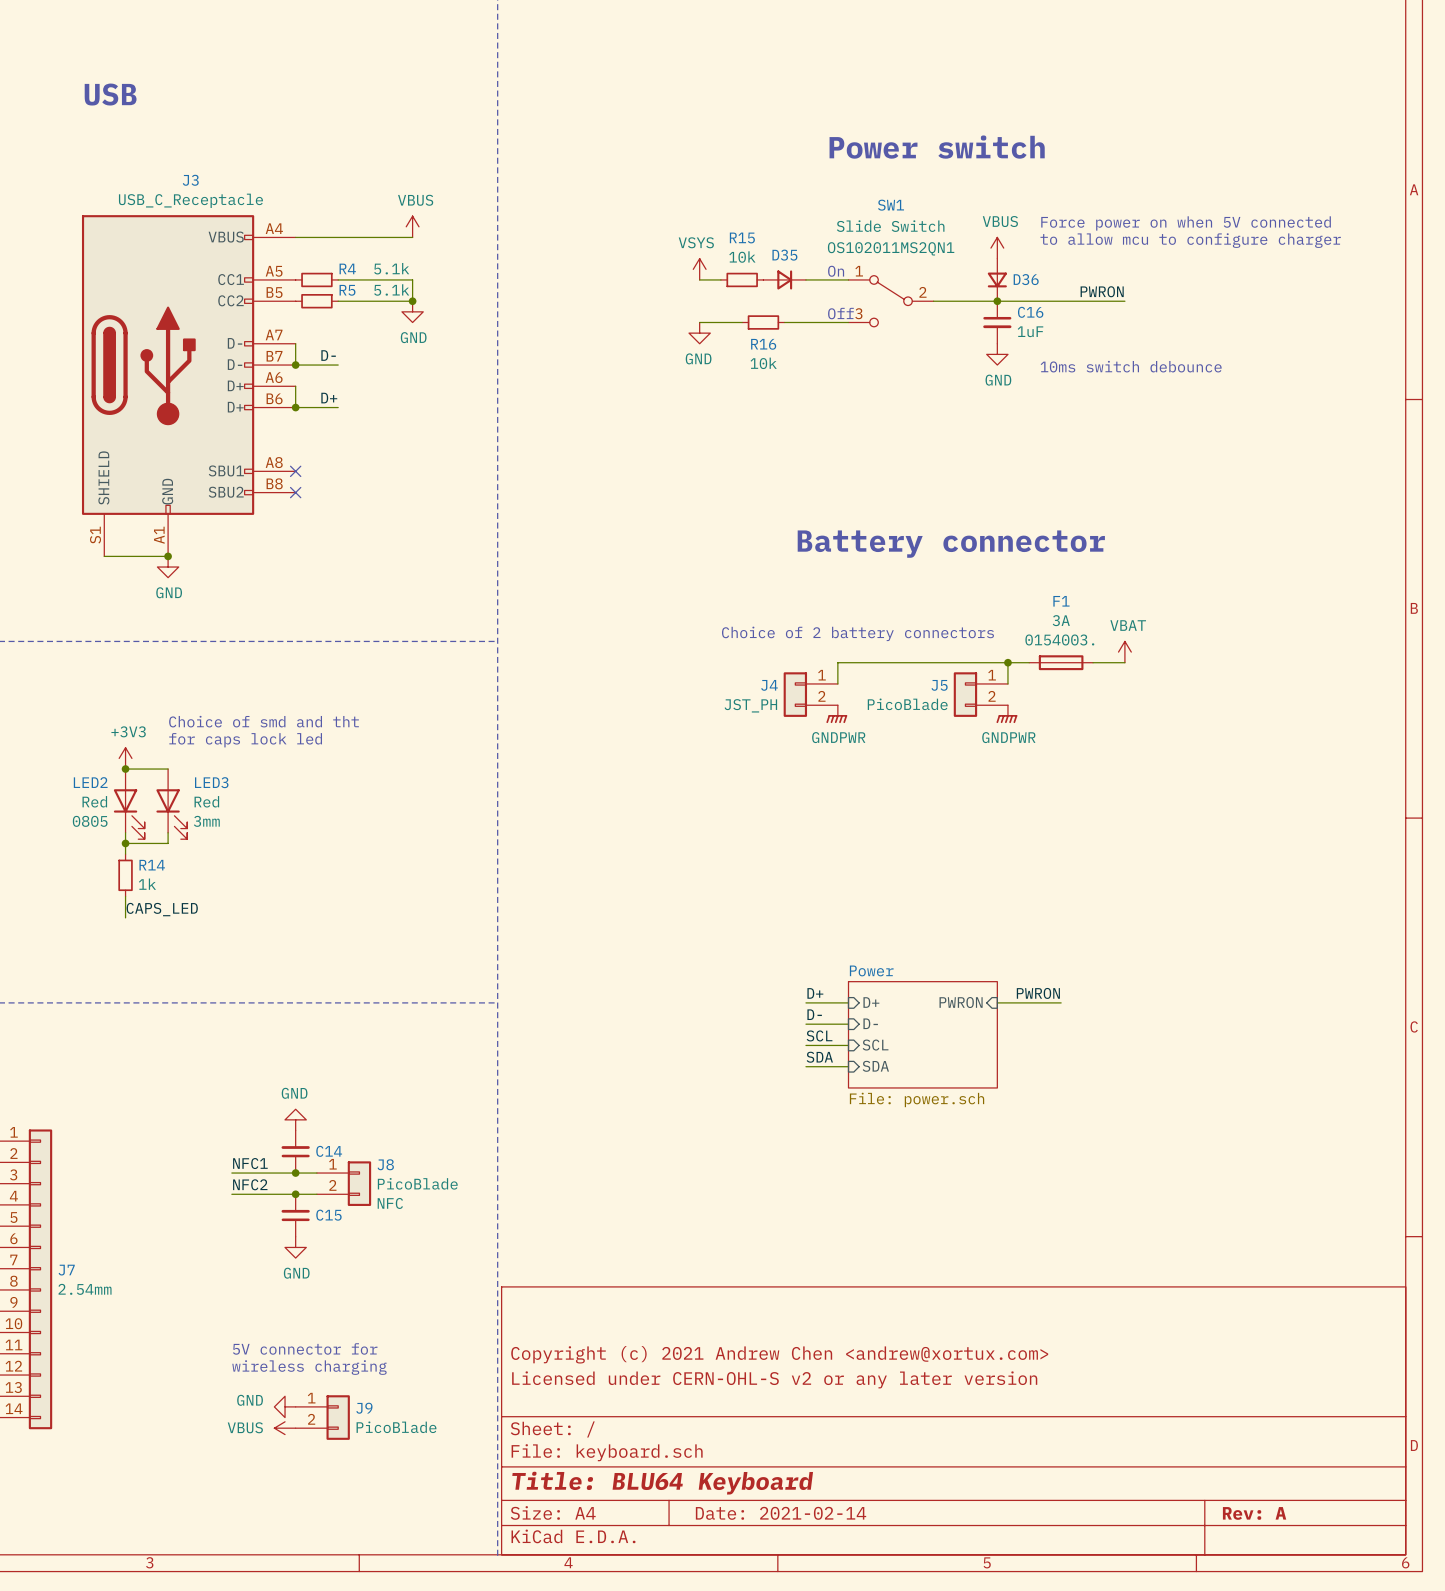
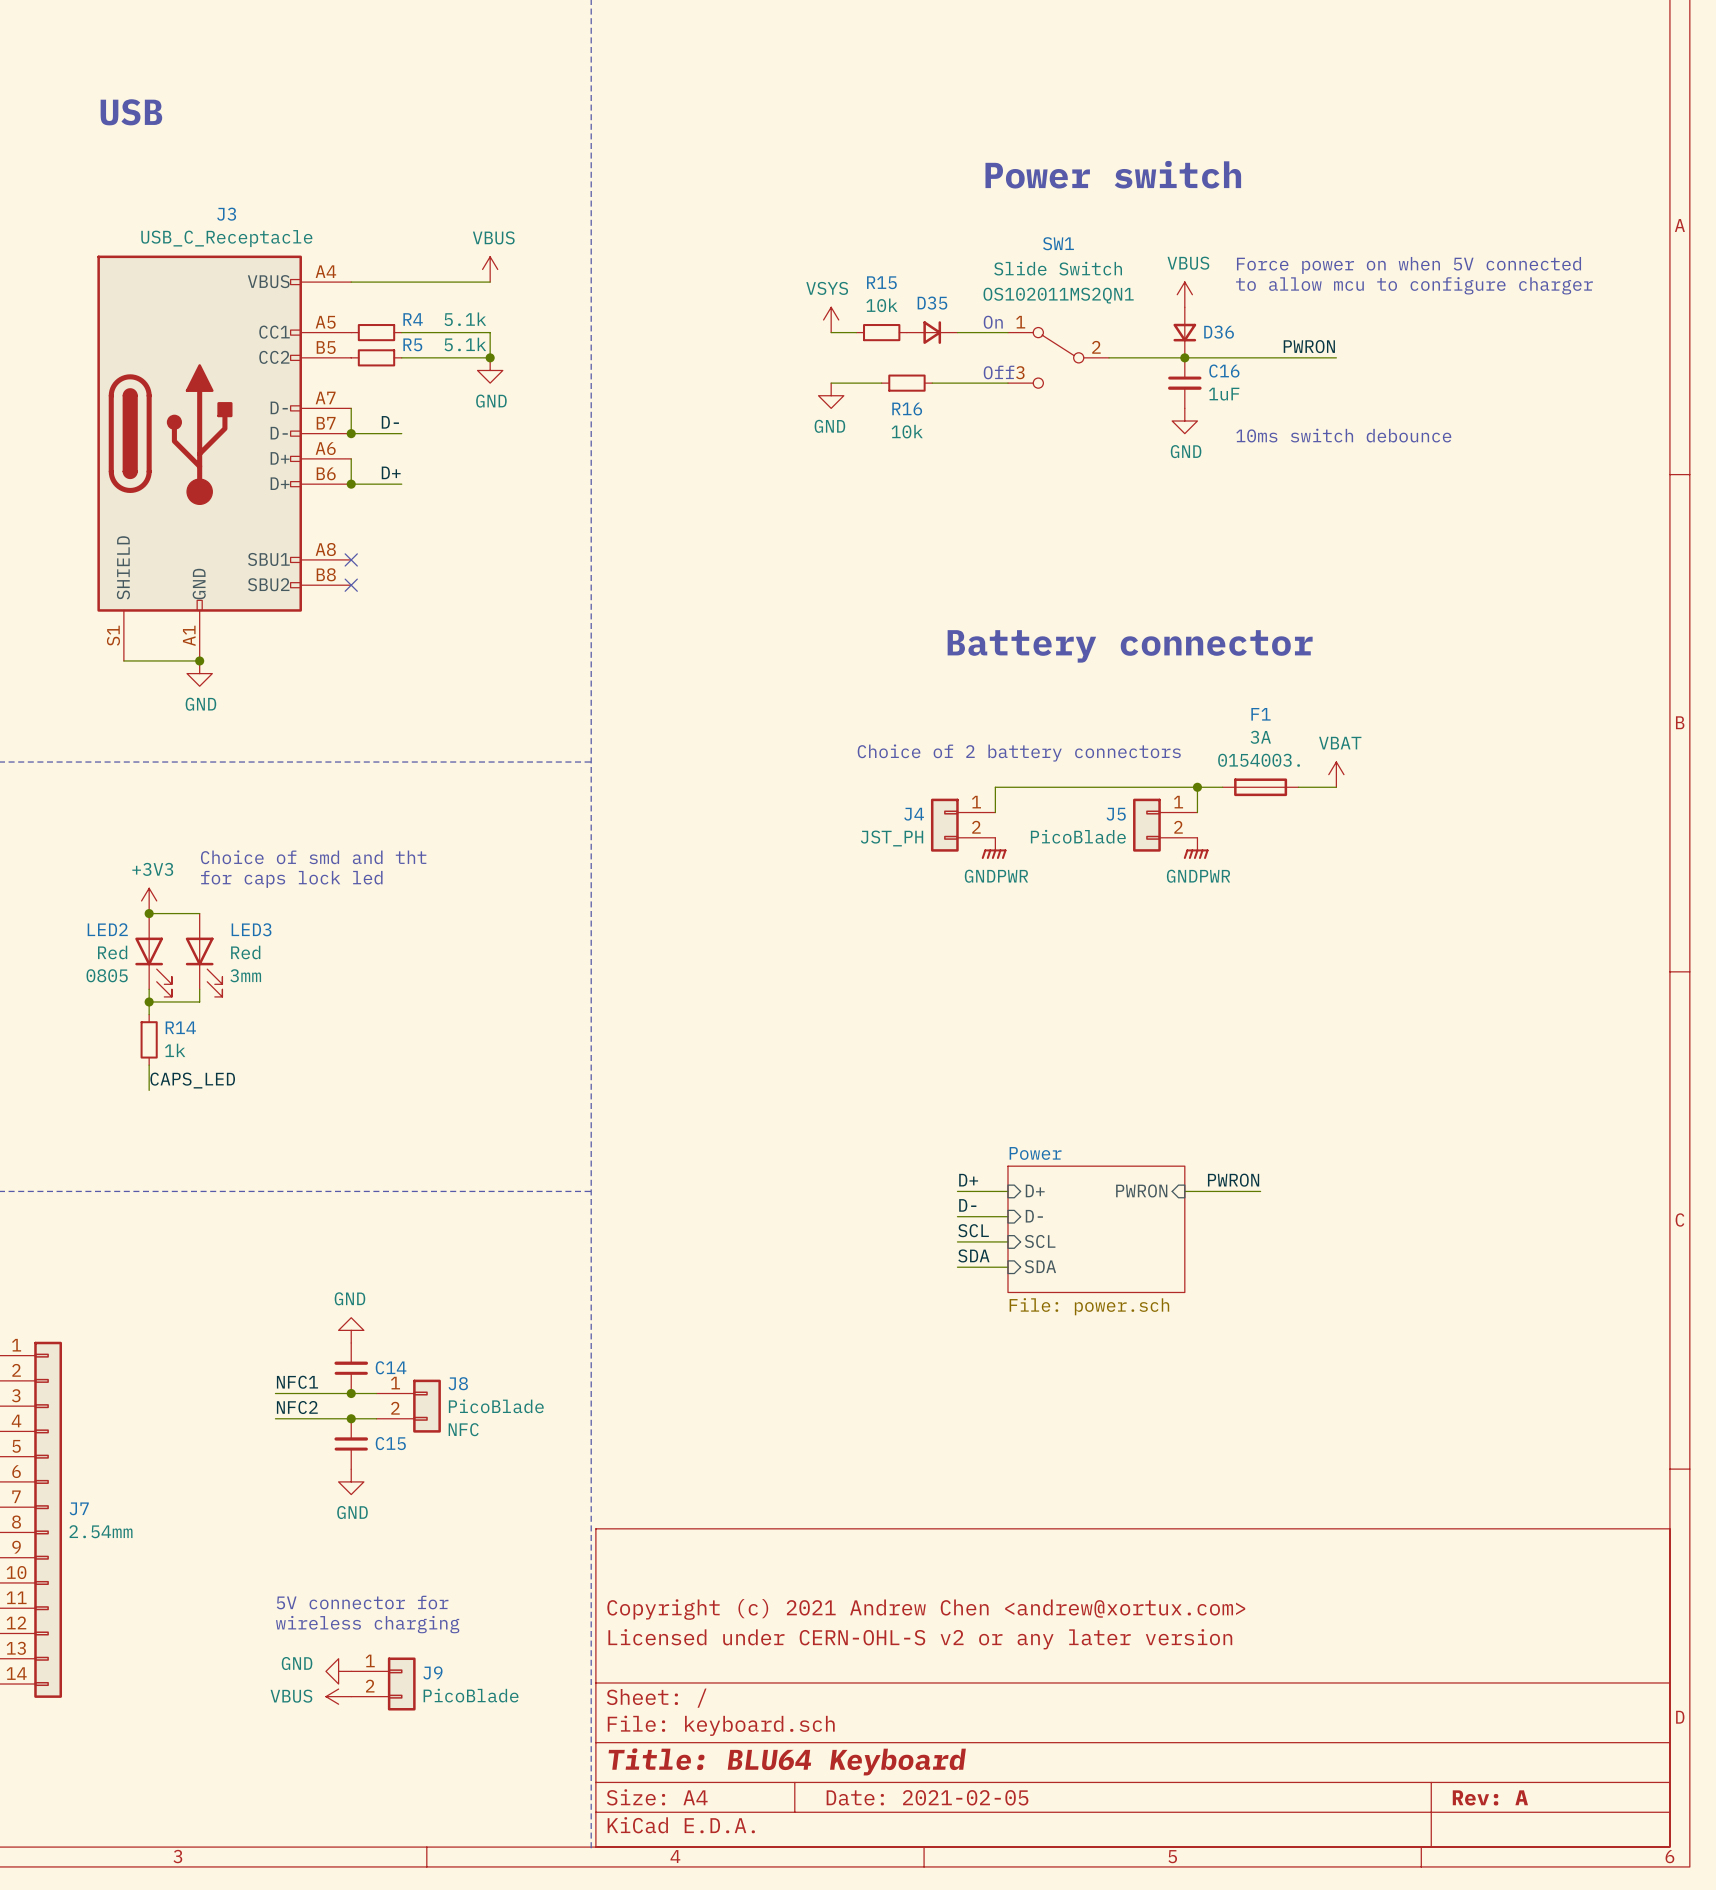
title block: Date: 2021-02-14 (781, 1513) -> Date: 2021-02-05 (927, 1797)

